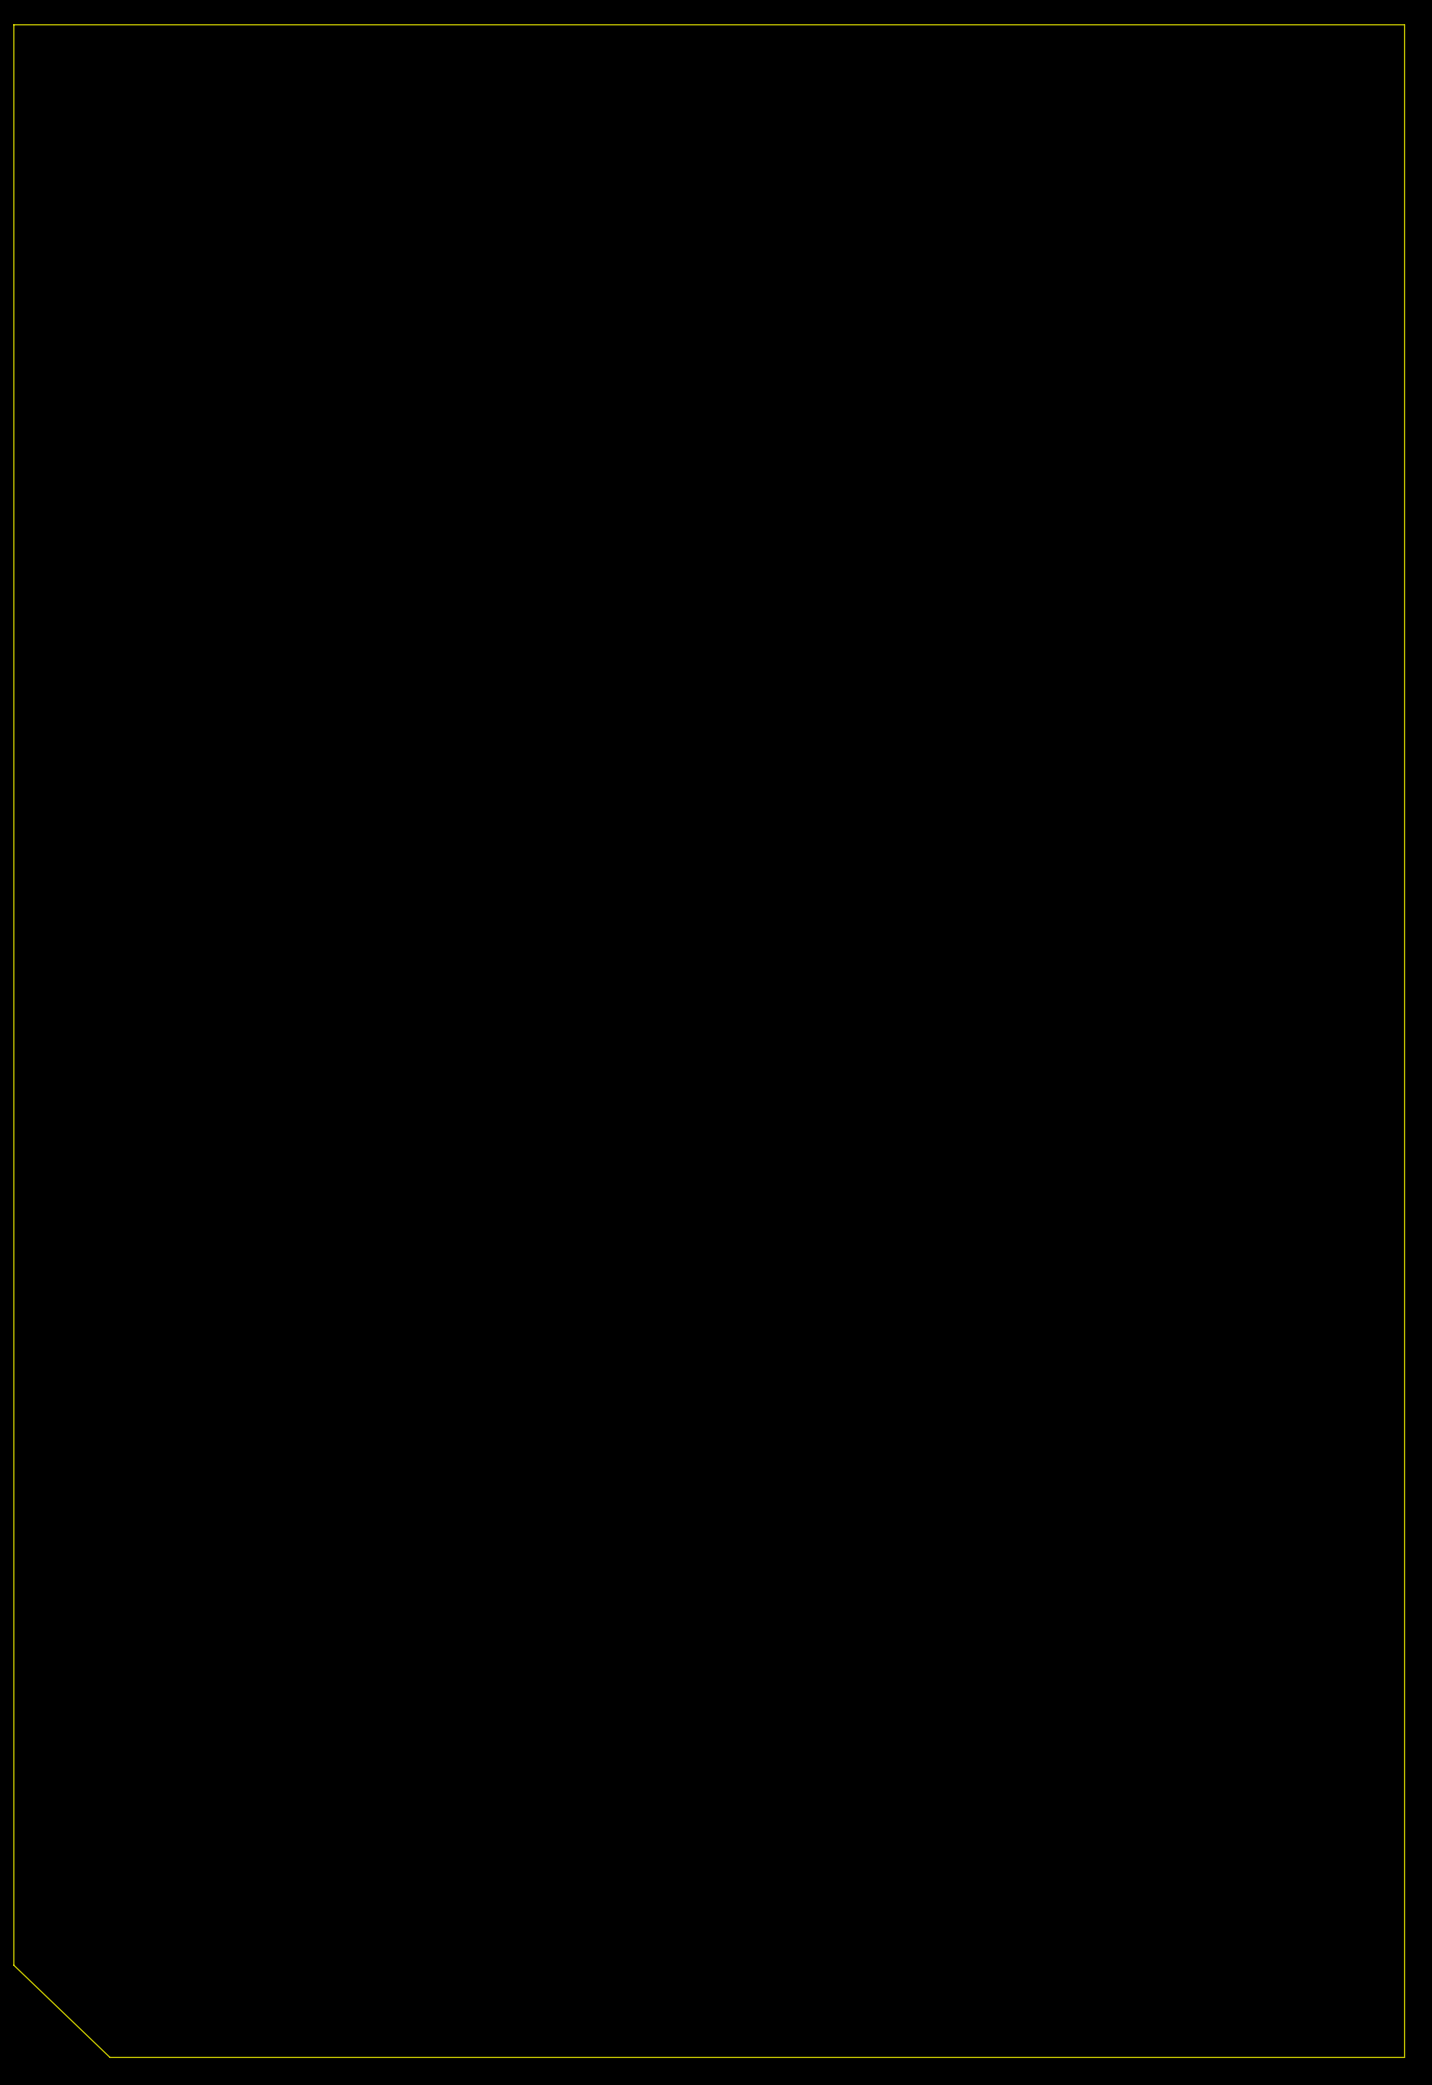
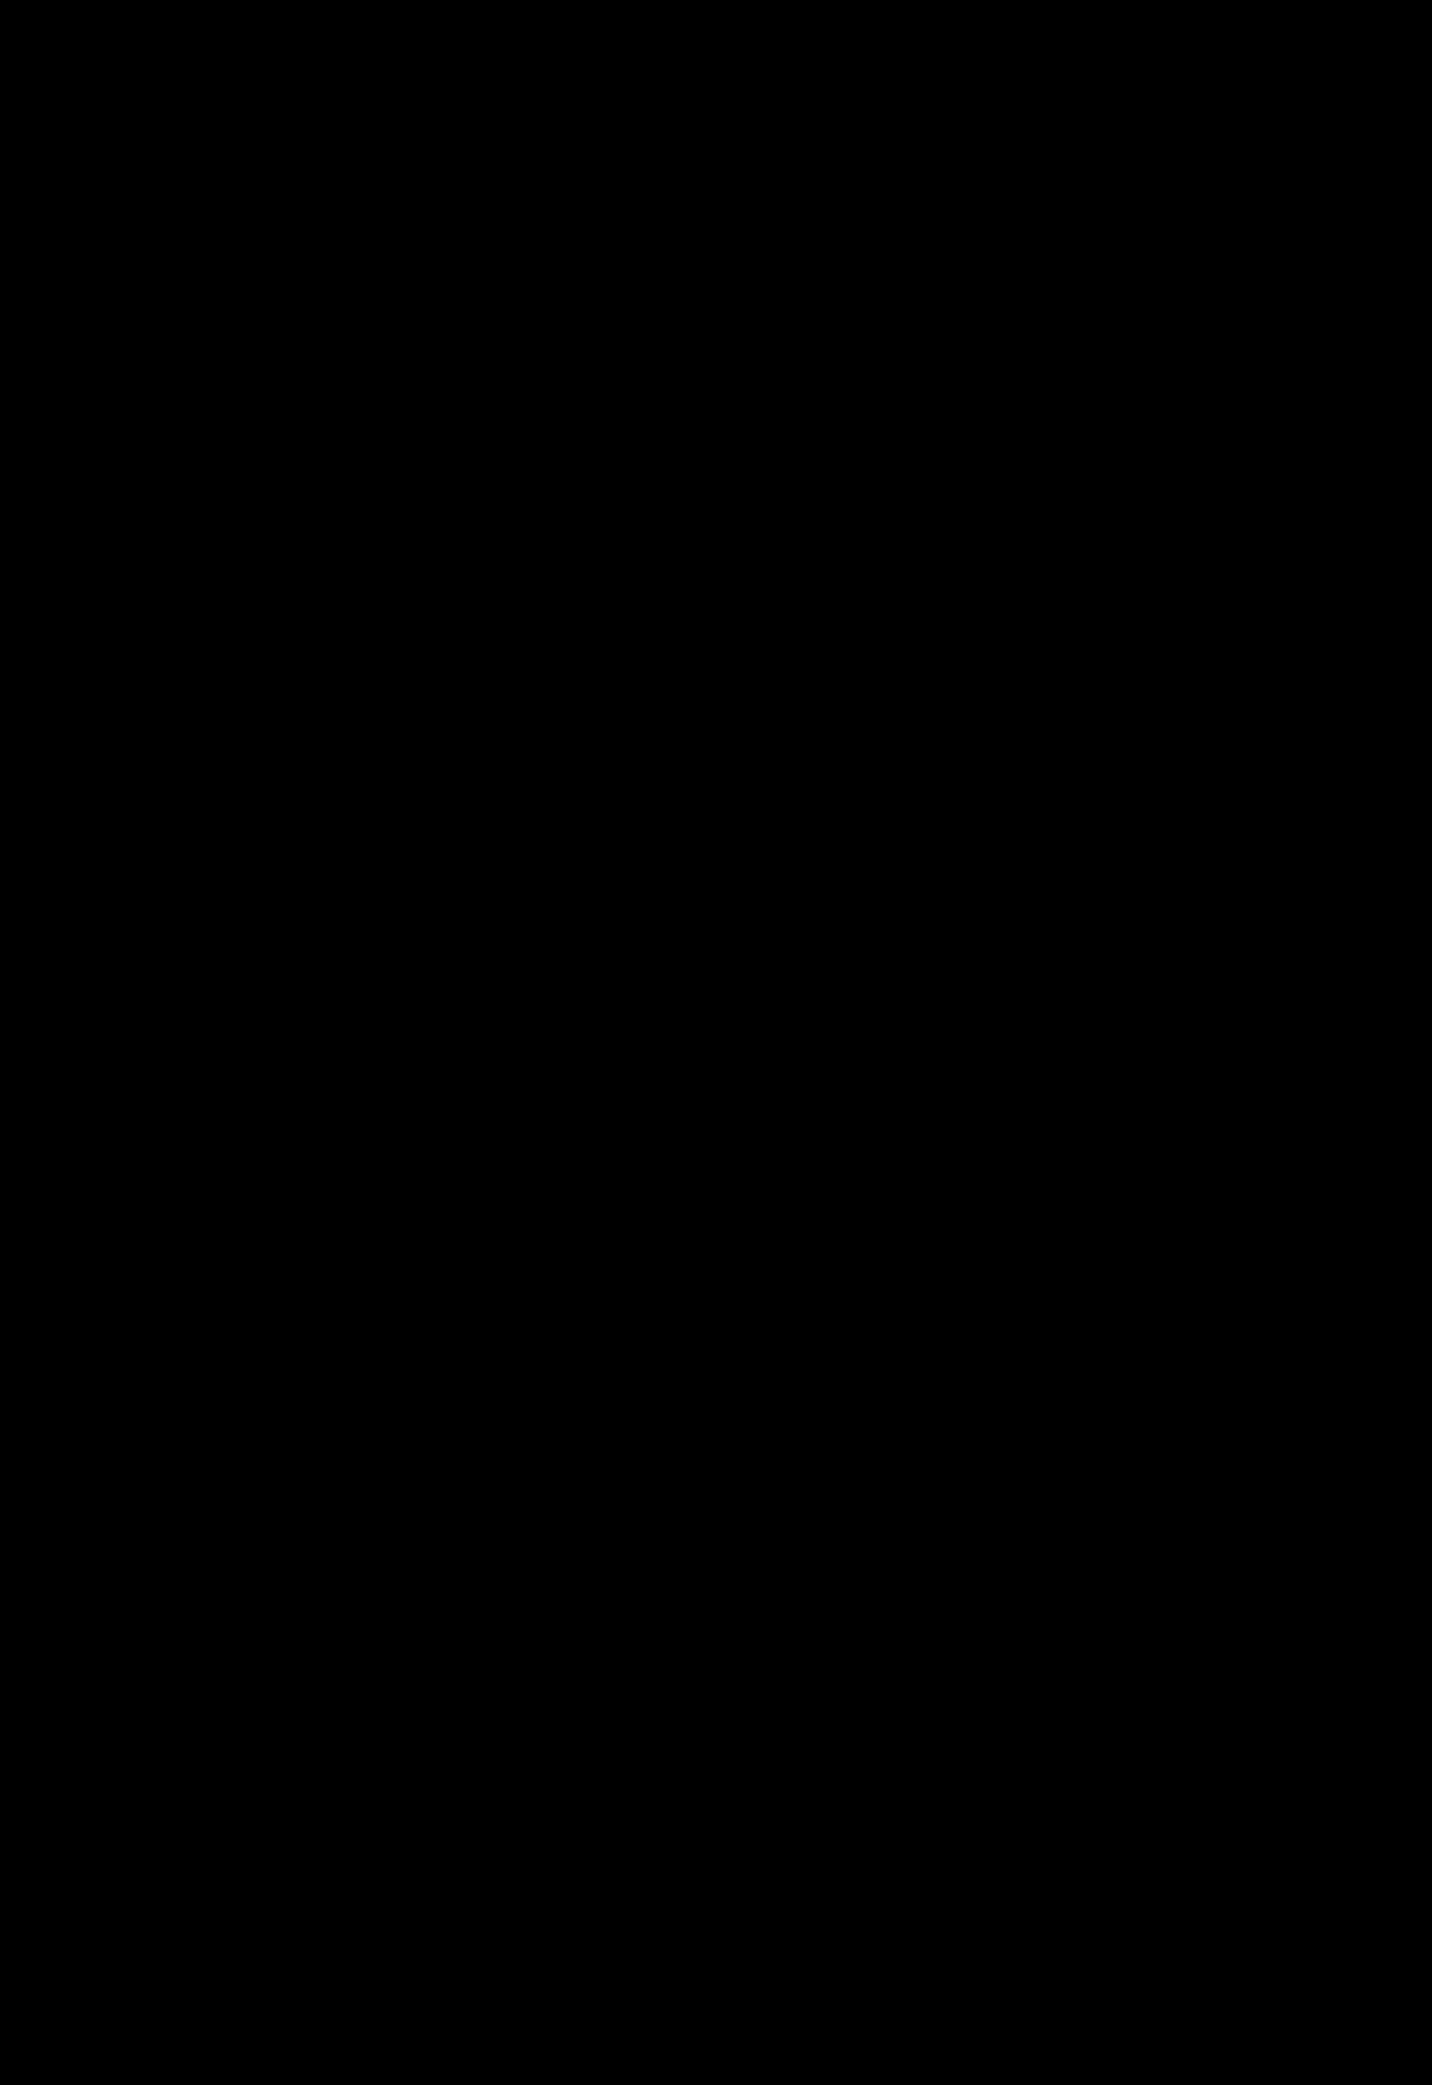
board edge: (1404, 24) (13, 24) (13, 1965) (109, 2057) (1404, 2057) (1404, 24) -> none

